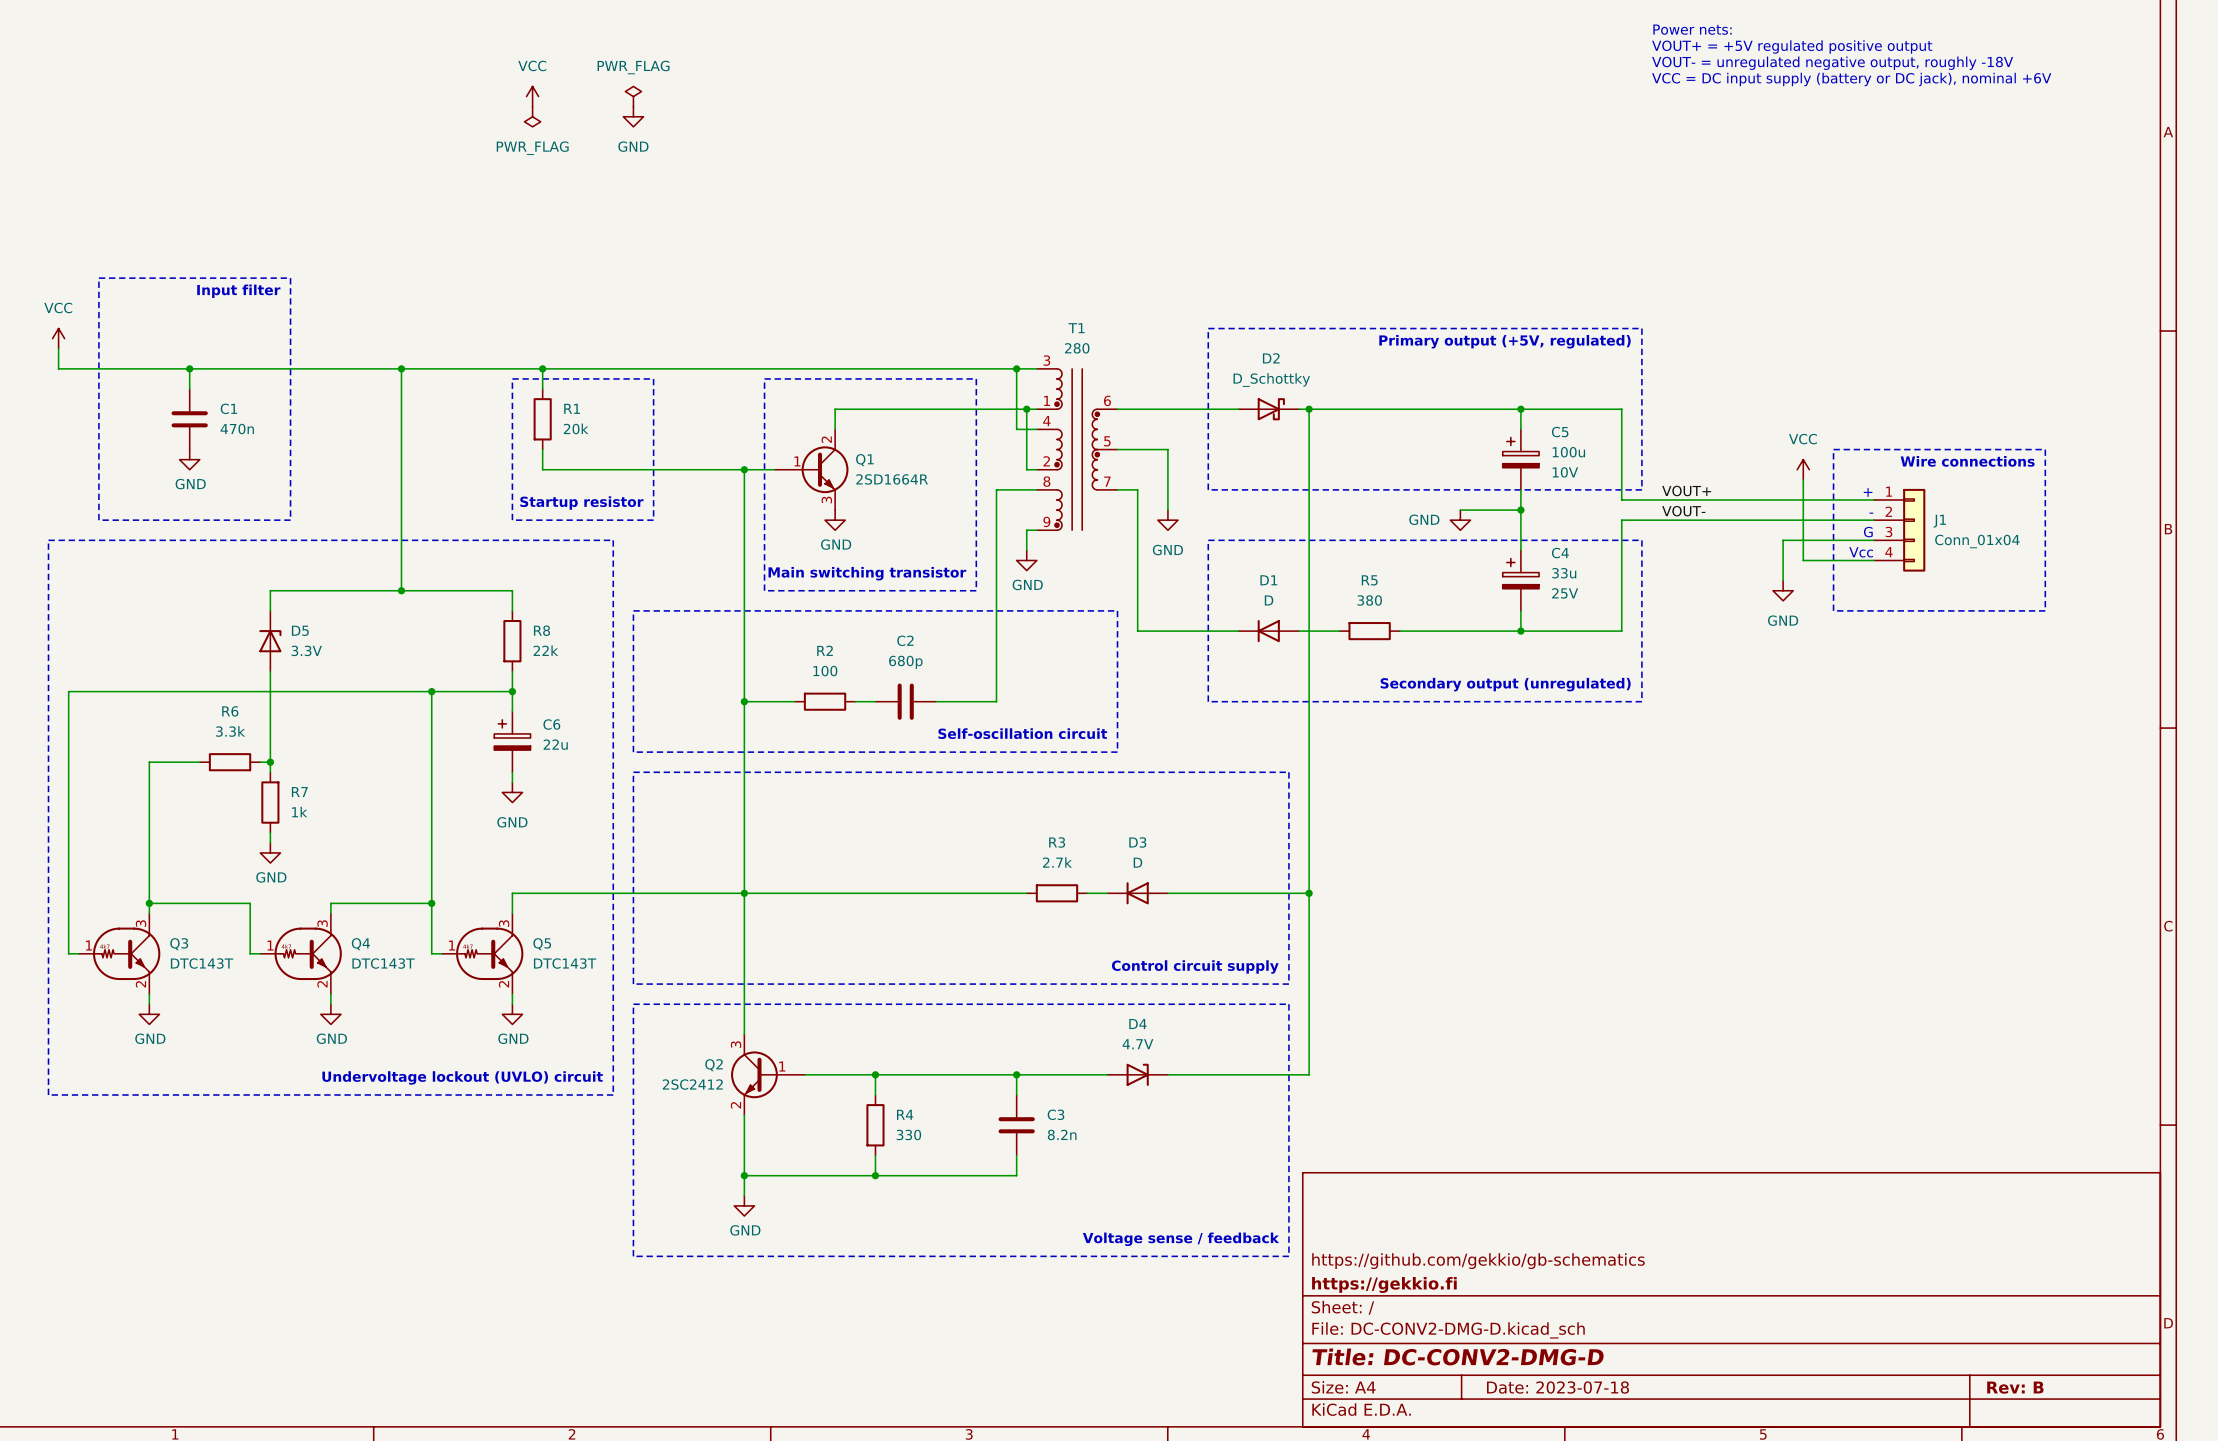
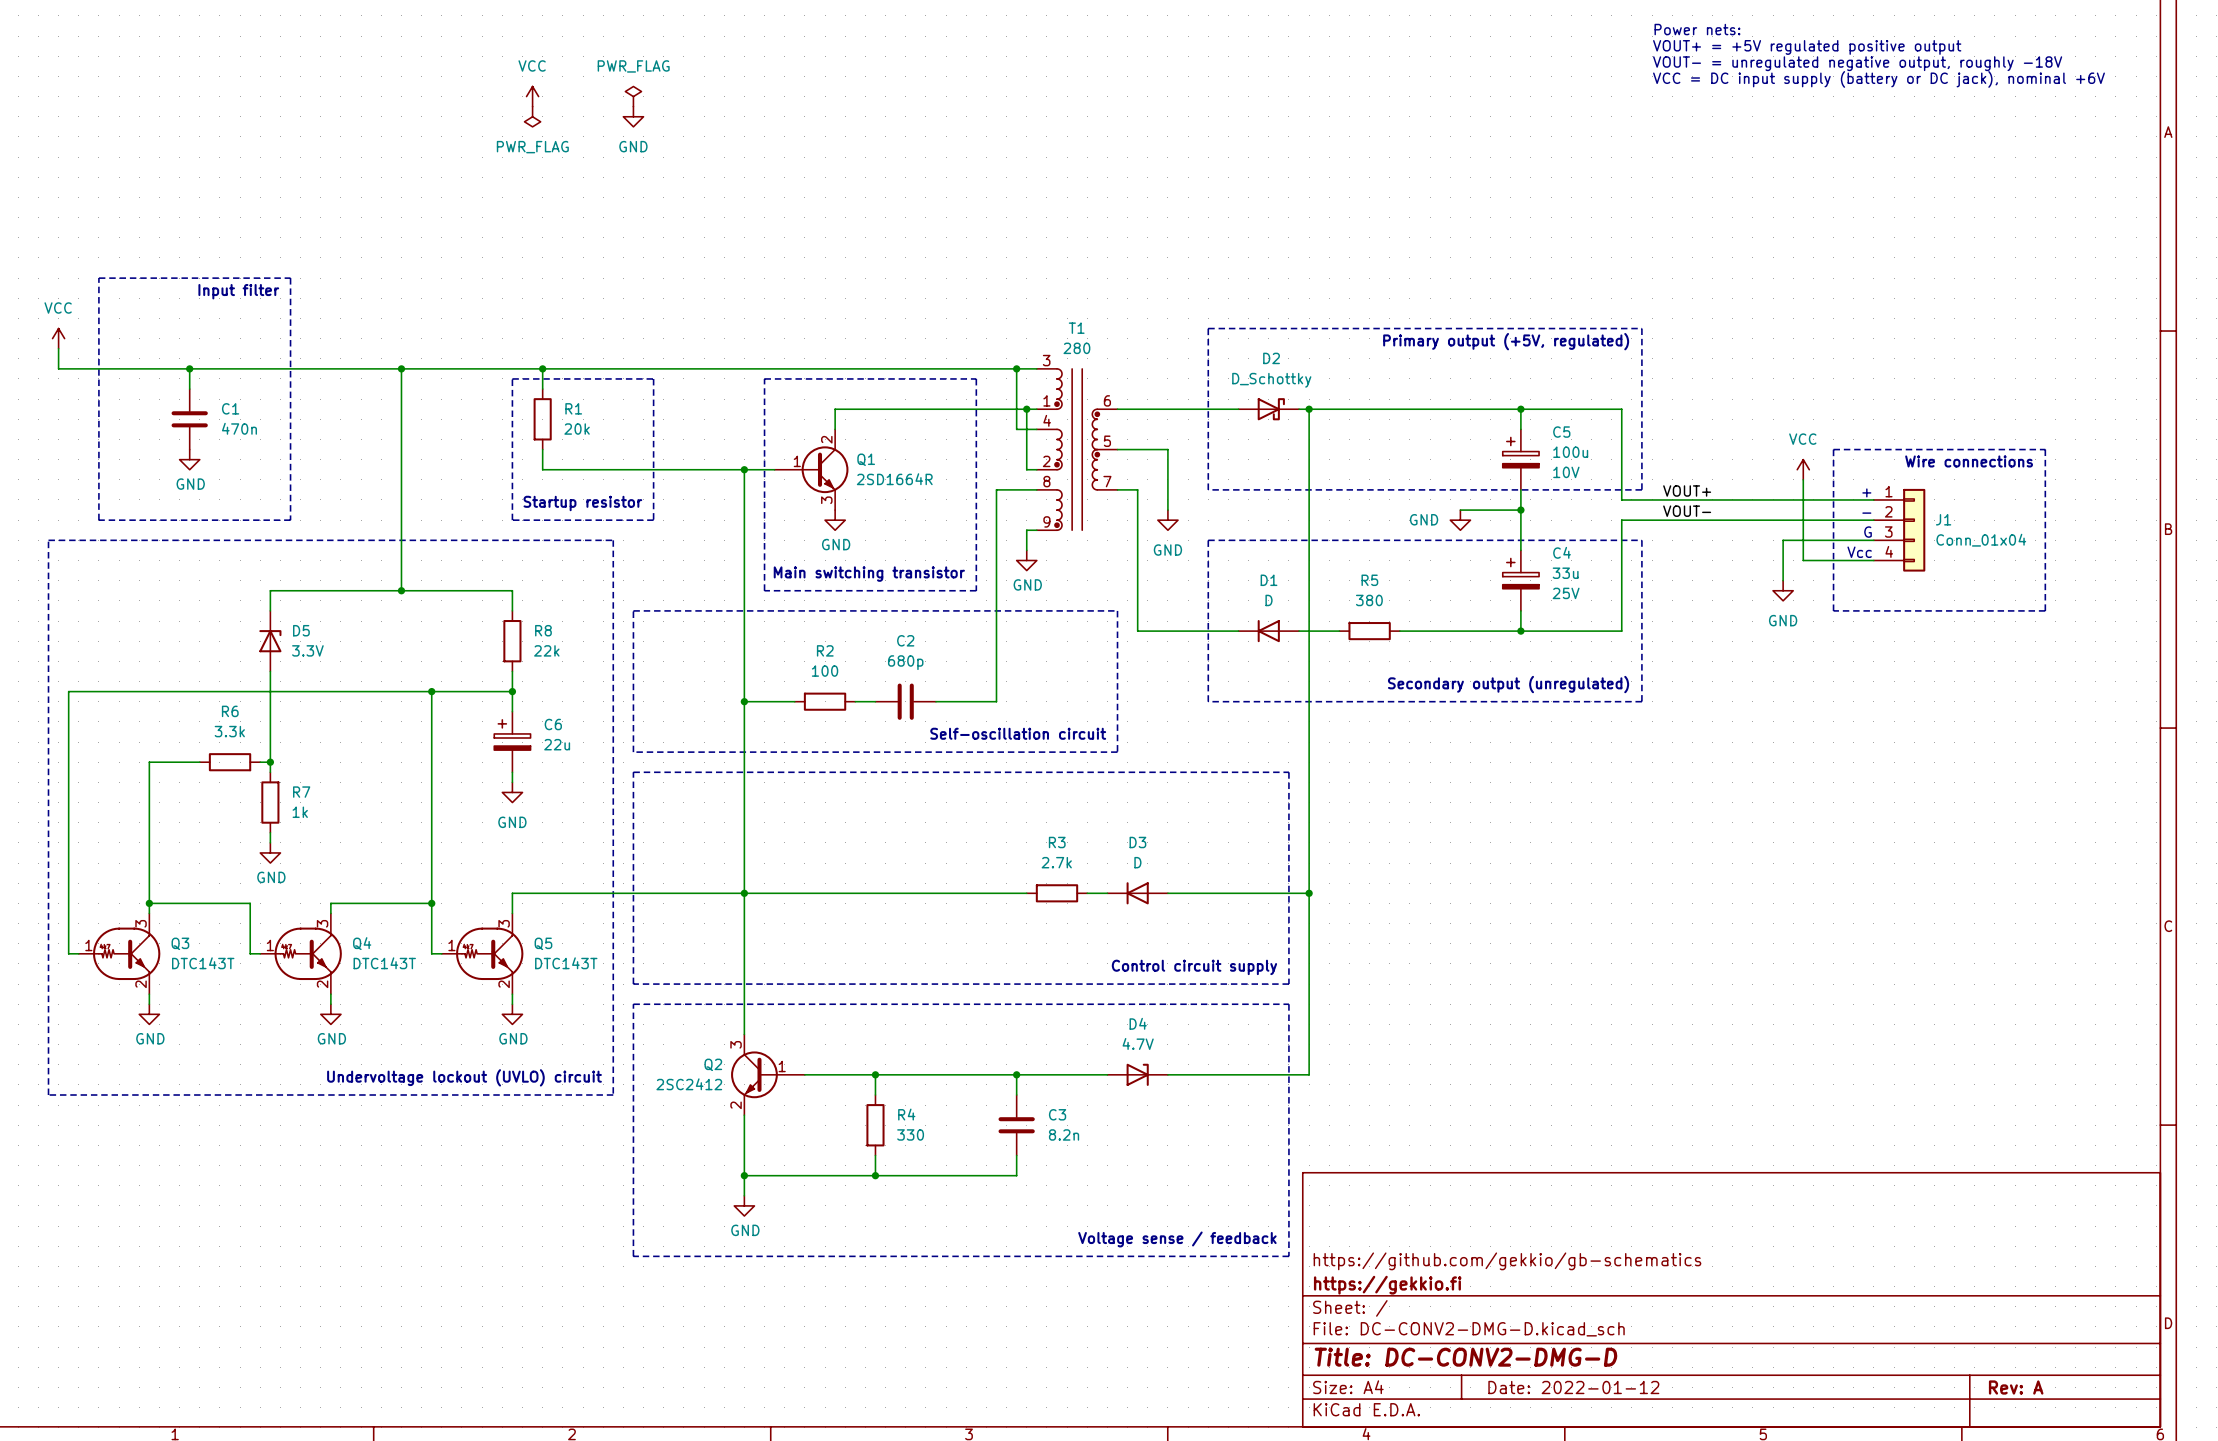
title block: Date: 2023-07-18 (1558, 1387) -> Date: 2022-01-12 (1573, 1387)
title block: Rev: B (2015, 1387) -> Rev: A (2016, 1387)

